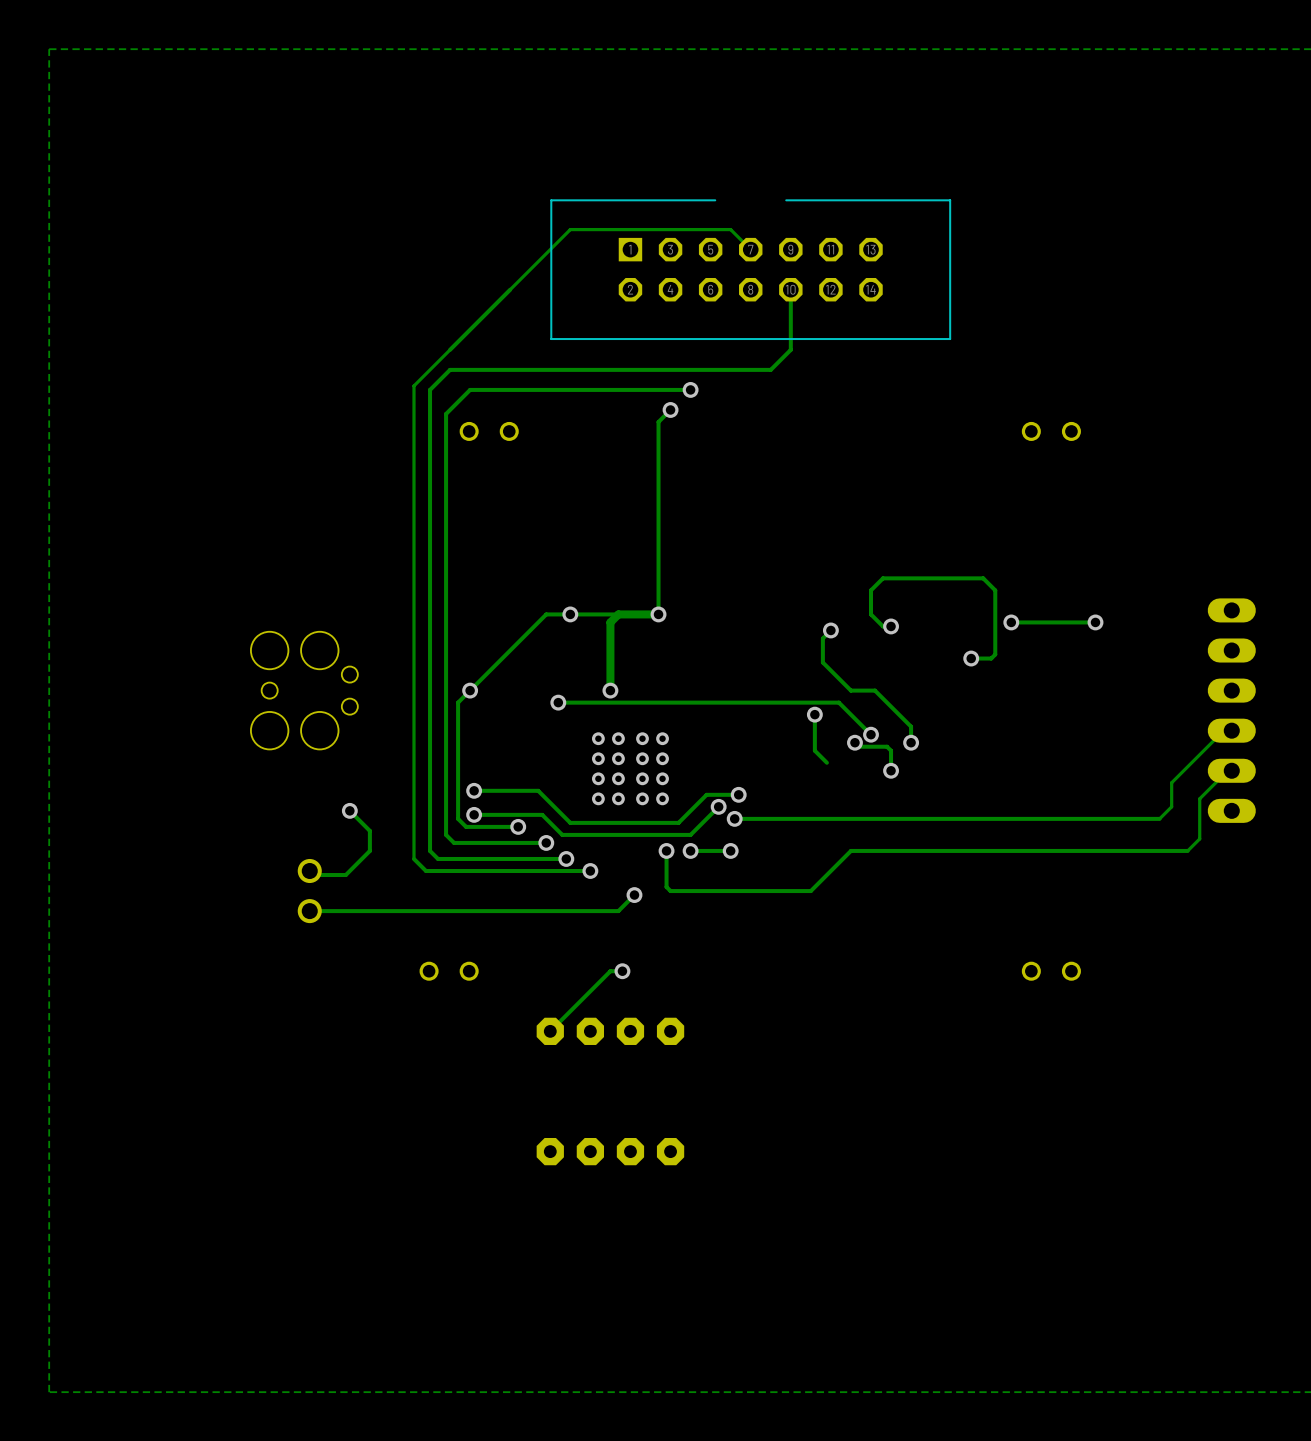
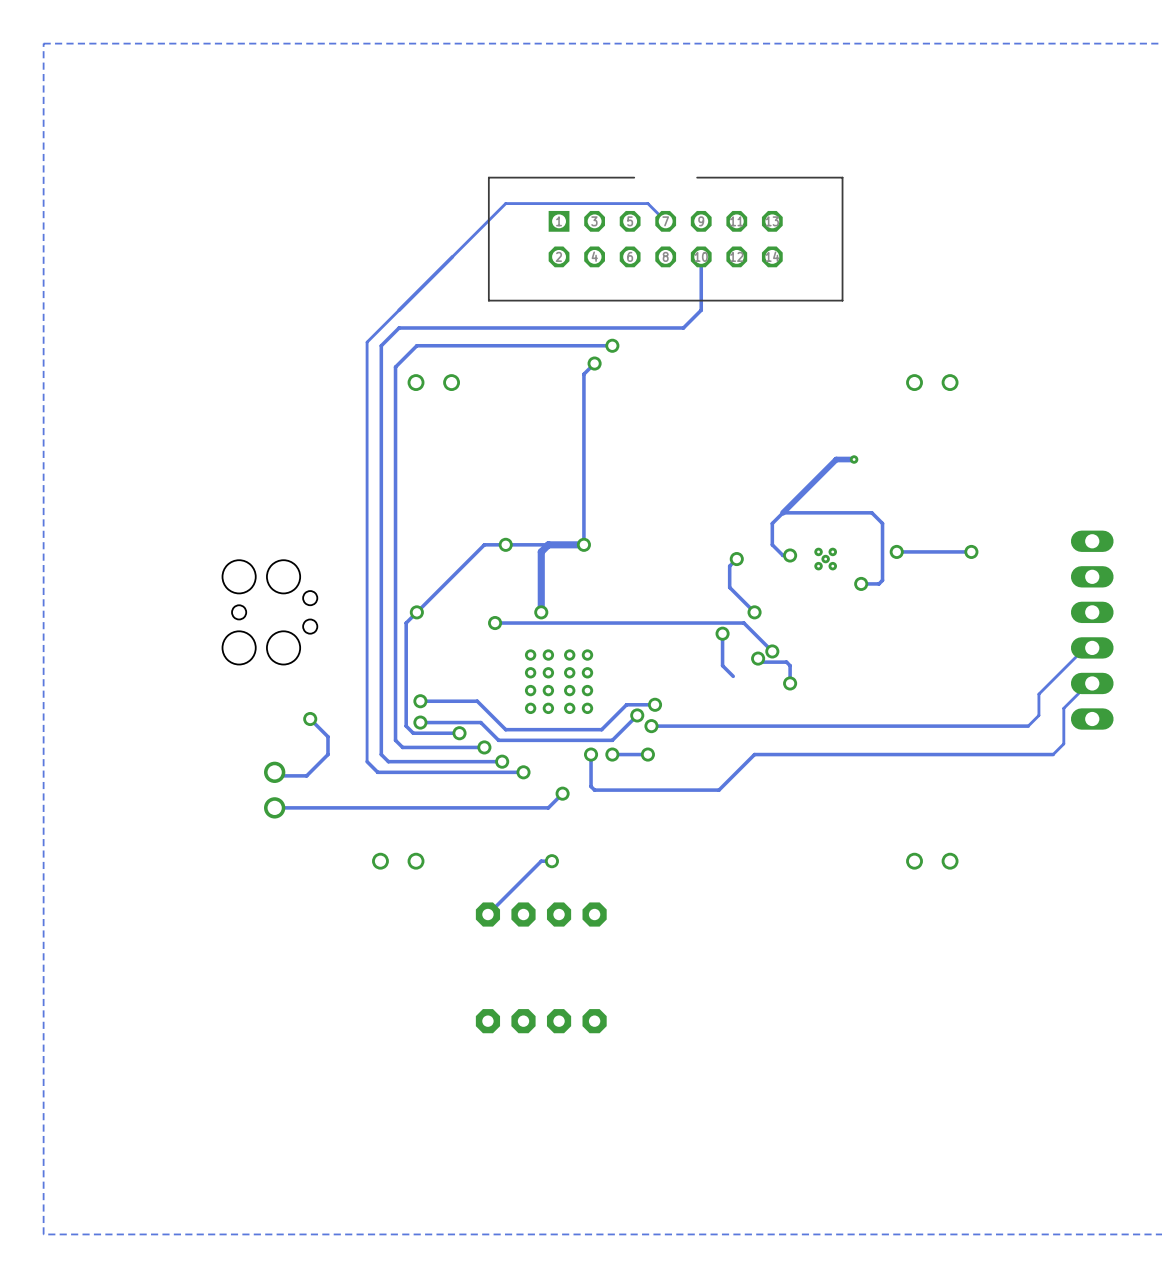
track: none -> (854, 459) (836, 459) (782, 512)
via: none -> (854, 459)
via: none -> (818, 551)
via: none -> (832, 551)
via: none -> (825, 559)
via: none -> (818, 566)
via: none -> (832, 566)
track: (850, 690) (875, 690) (911, 726) (911, 742) -> none
via position: (911, 742) -> (754, 612)

